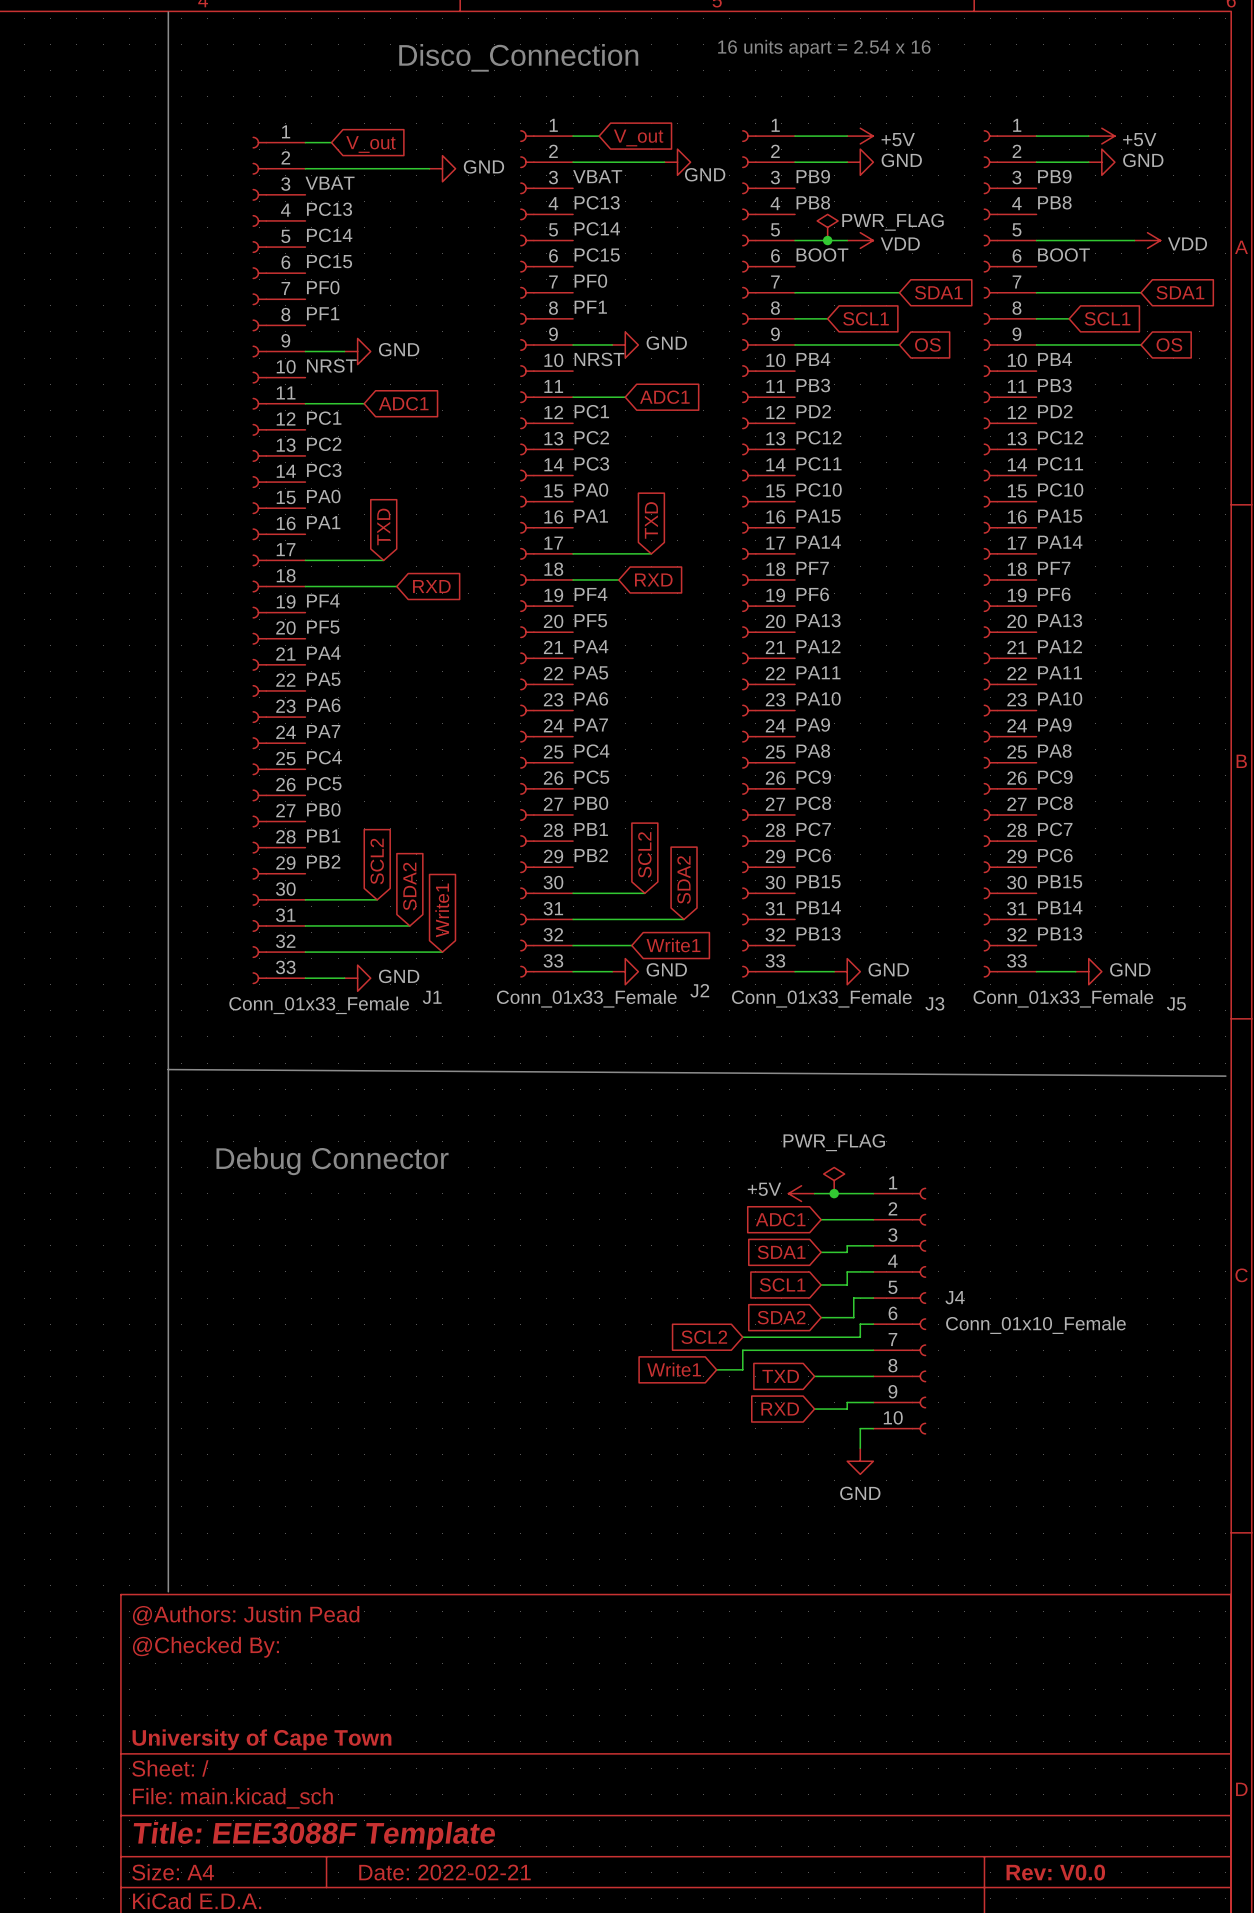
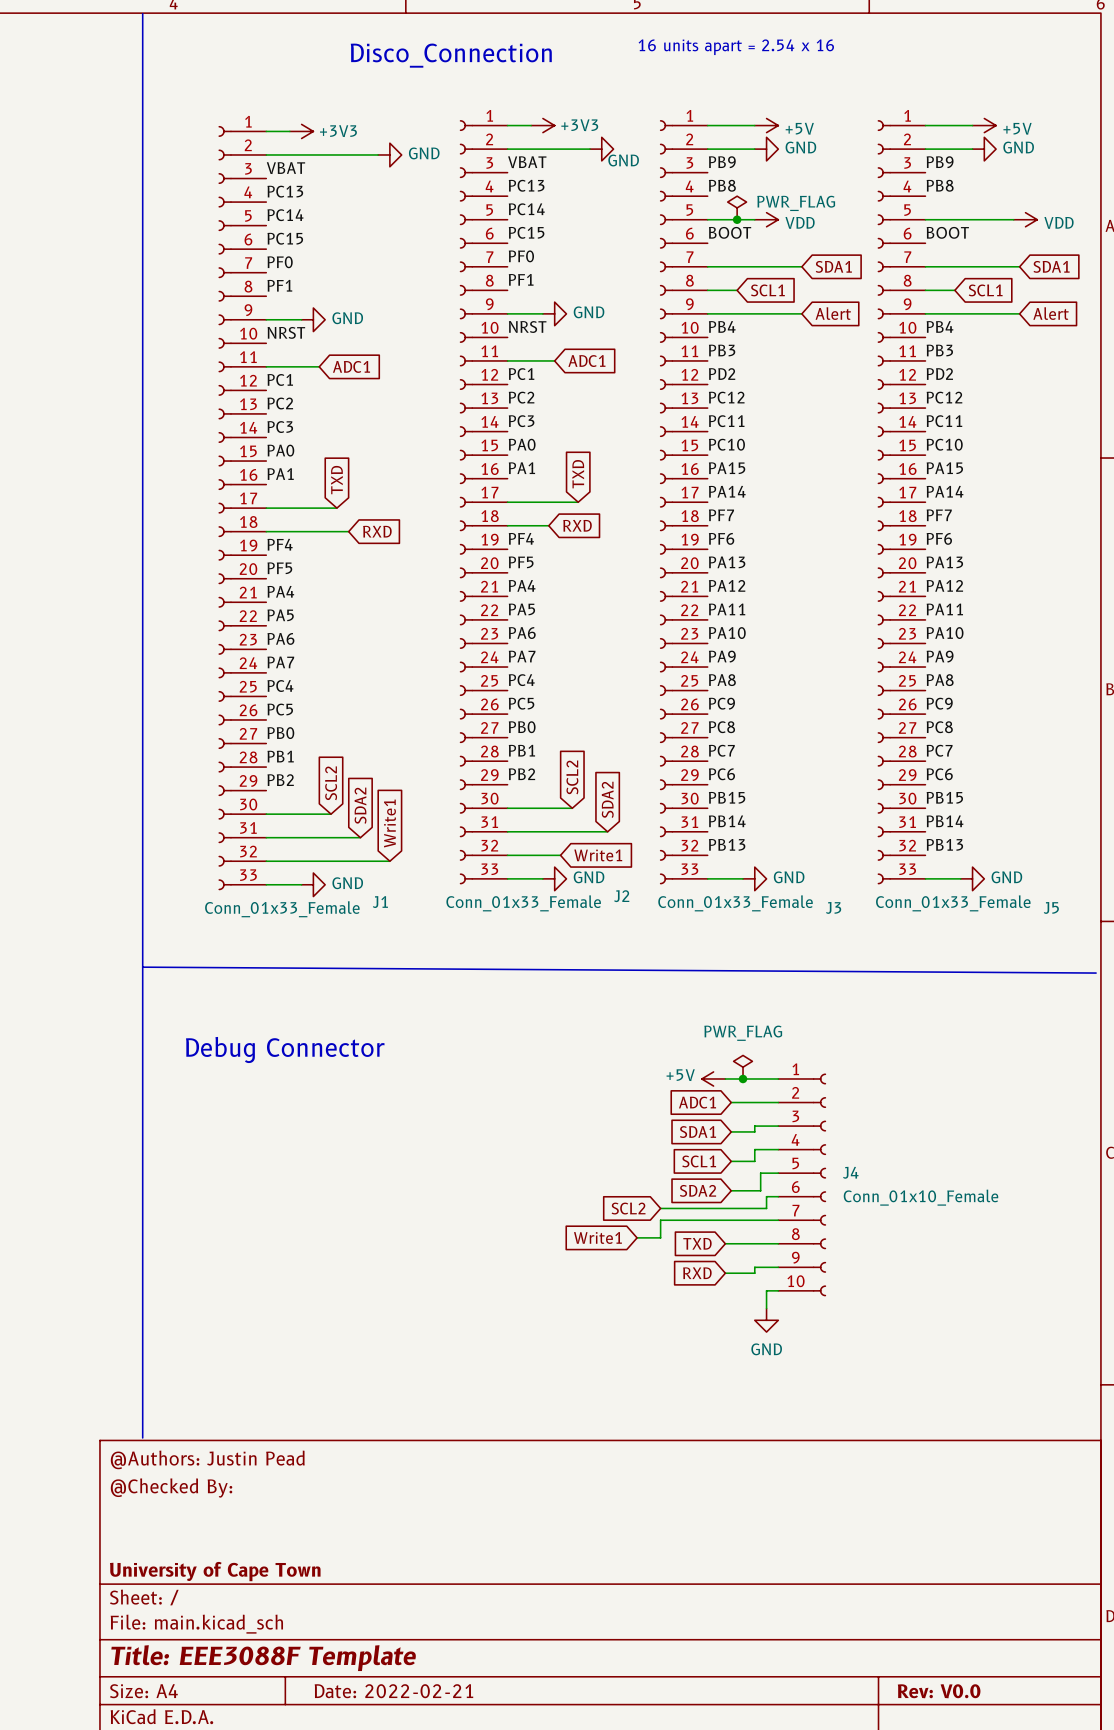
power symbol: none -> +3V3 (542, 125)
global label: V_out (638, 137) -> none
power symbol: none -> +3V3 (301, 131)
global label: V_out (370, 144) -> none
global label: OS (927, 344) -> Alert (833, 313)
global label: OS (1169, 344) -> Alert (1051, 313)

